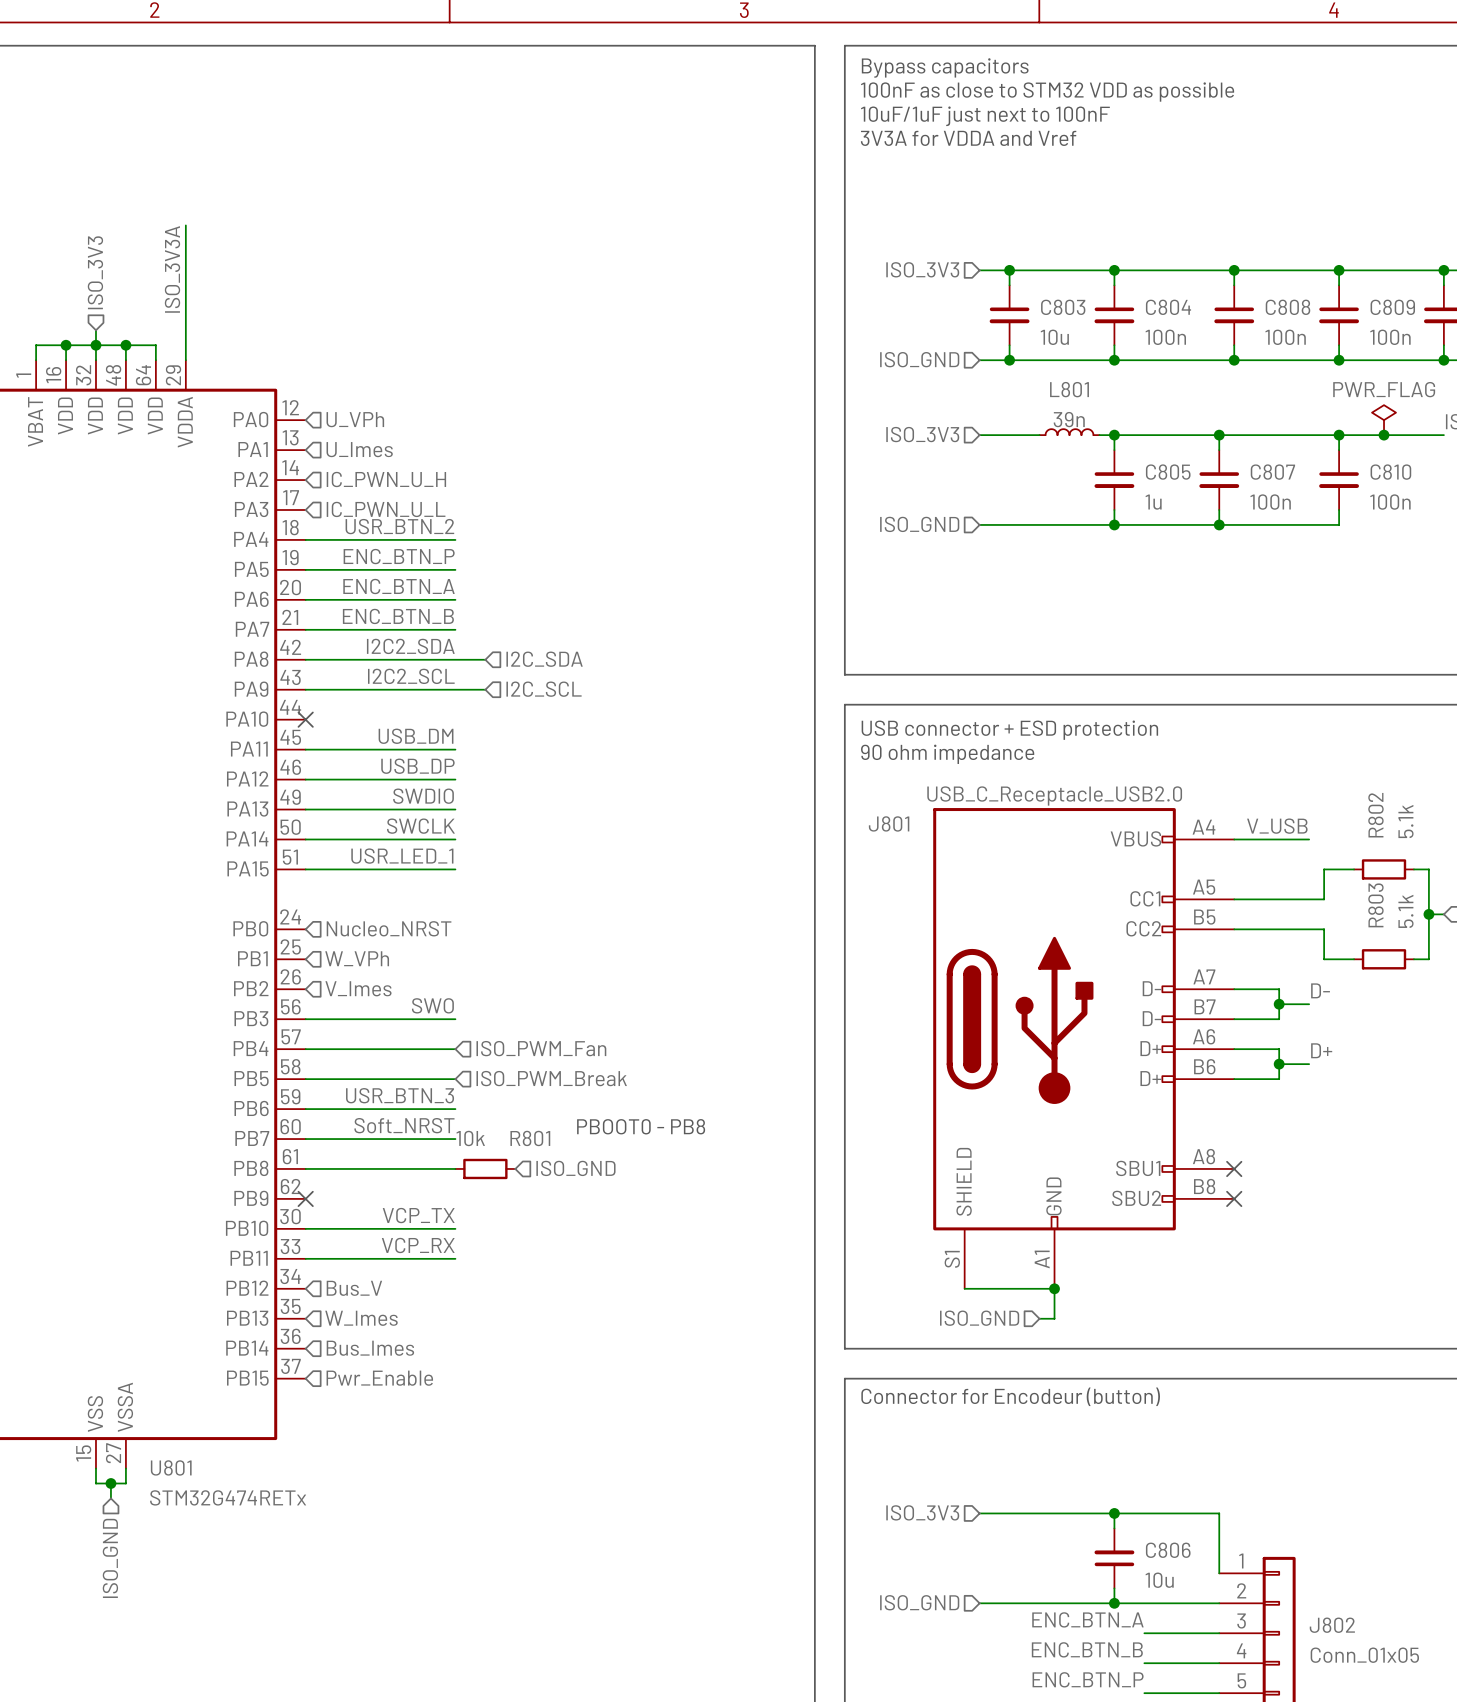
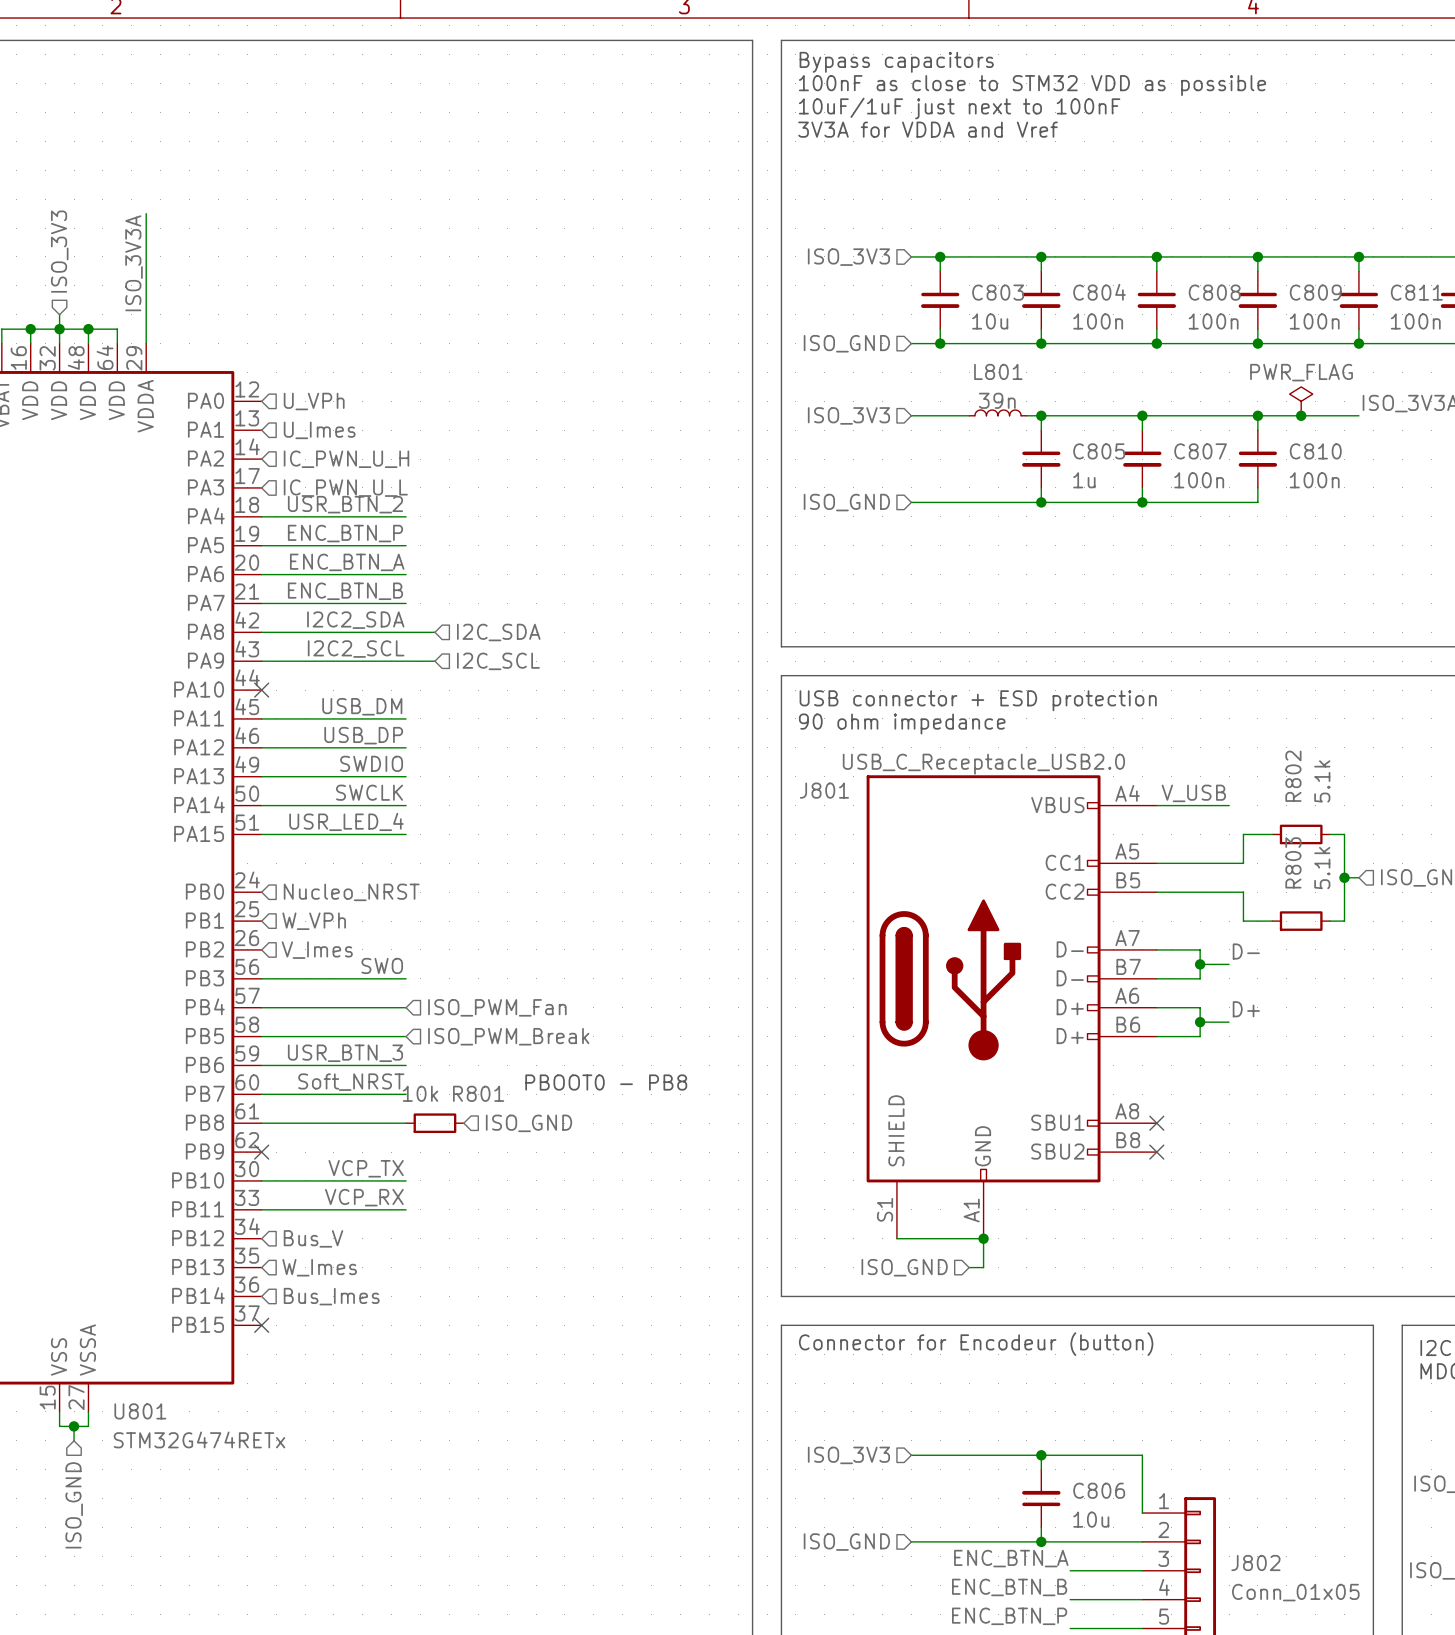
label: USR_LED_1 (402, 856) -> USR_LED_4 (346, 821)
no-connect mark: none -> (261, 1325)
hierarchical label: Pwr_Enable (379, 1378) -> none

